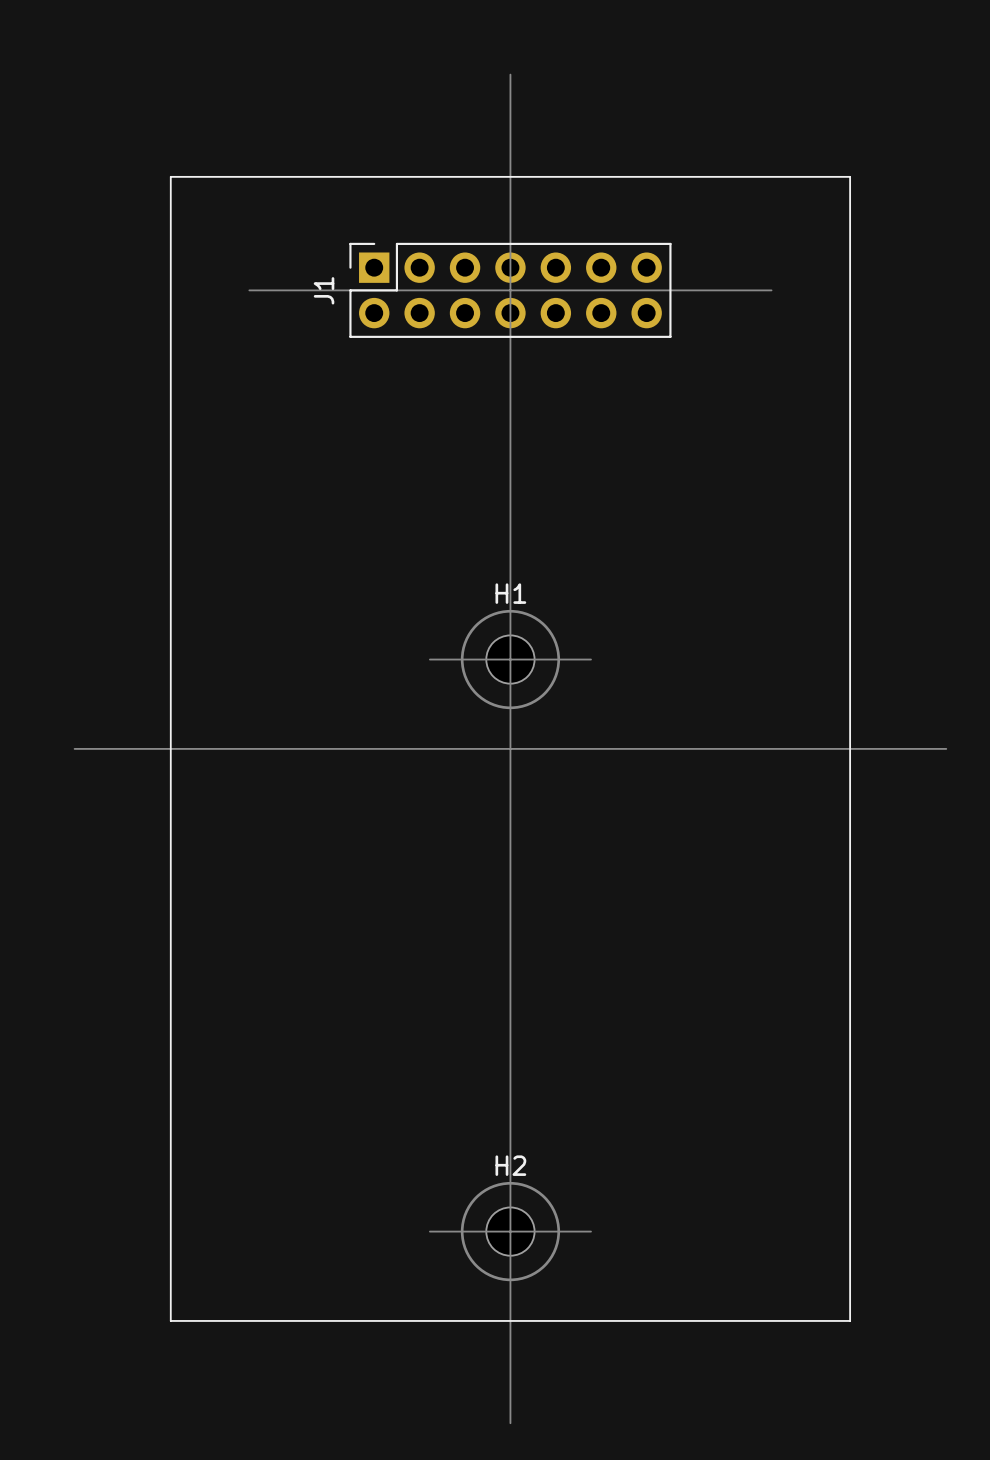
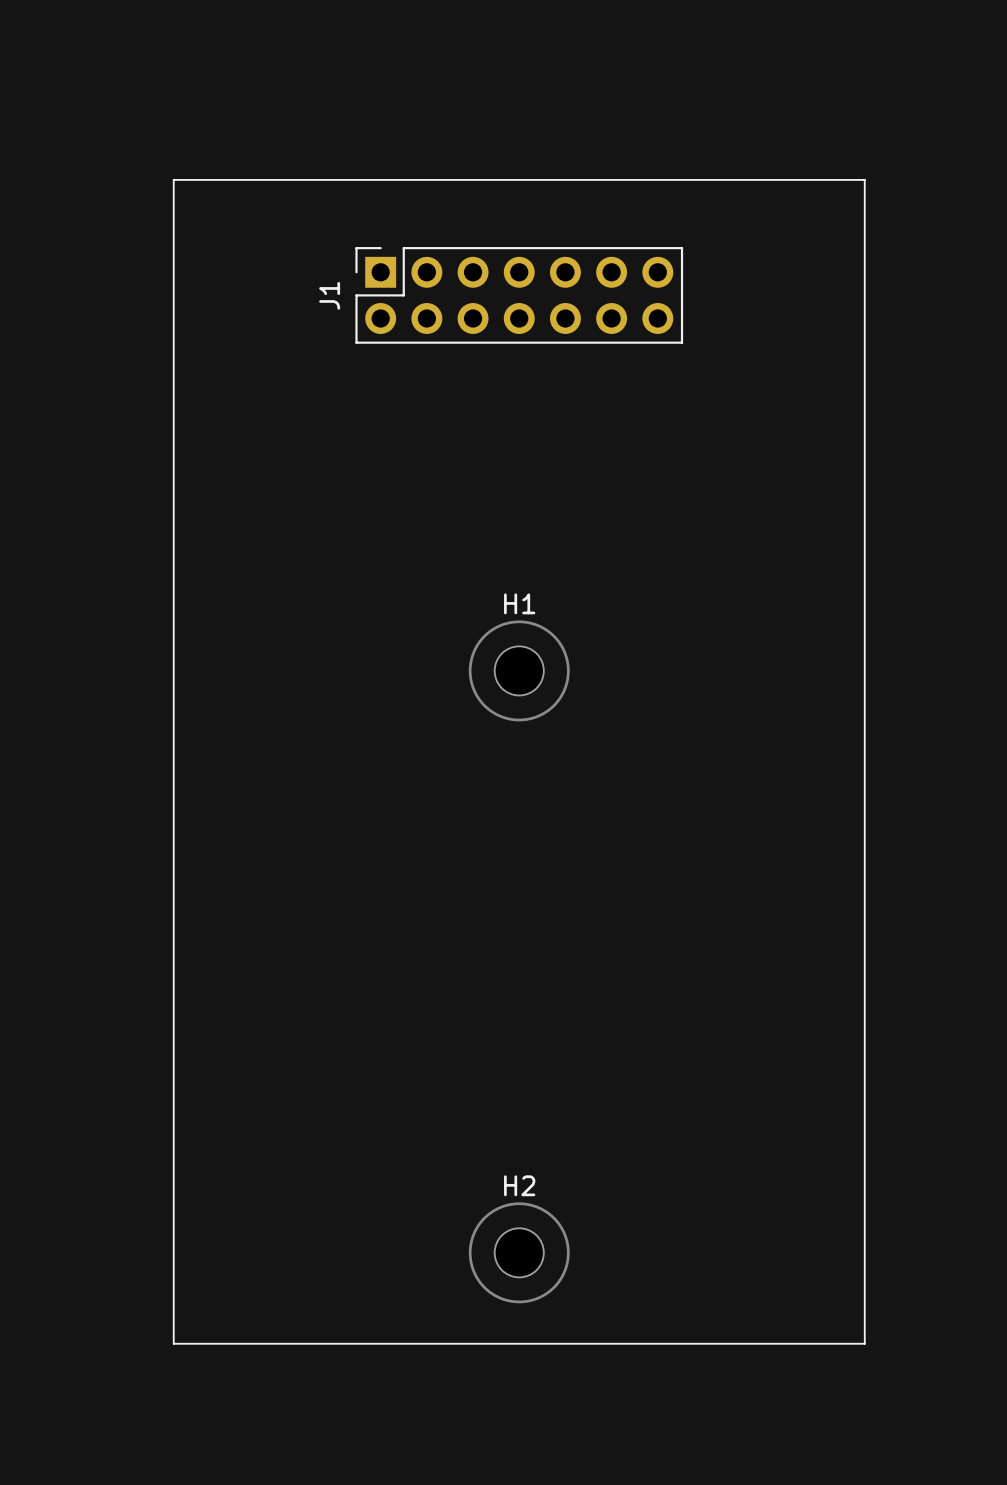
line: (510, 74) (510, 1423) -> none
line: (249, 290) (771, 290) -> none
line: (429, 659) (590, 659) -> none
line: (74, 748) (946, 748) -> none
line: (429, 1231) (590, 1231) -> none

